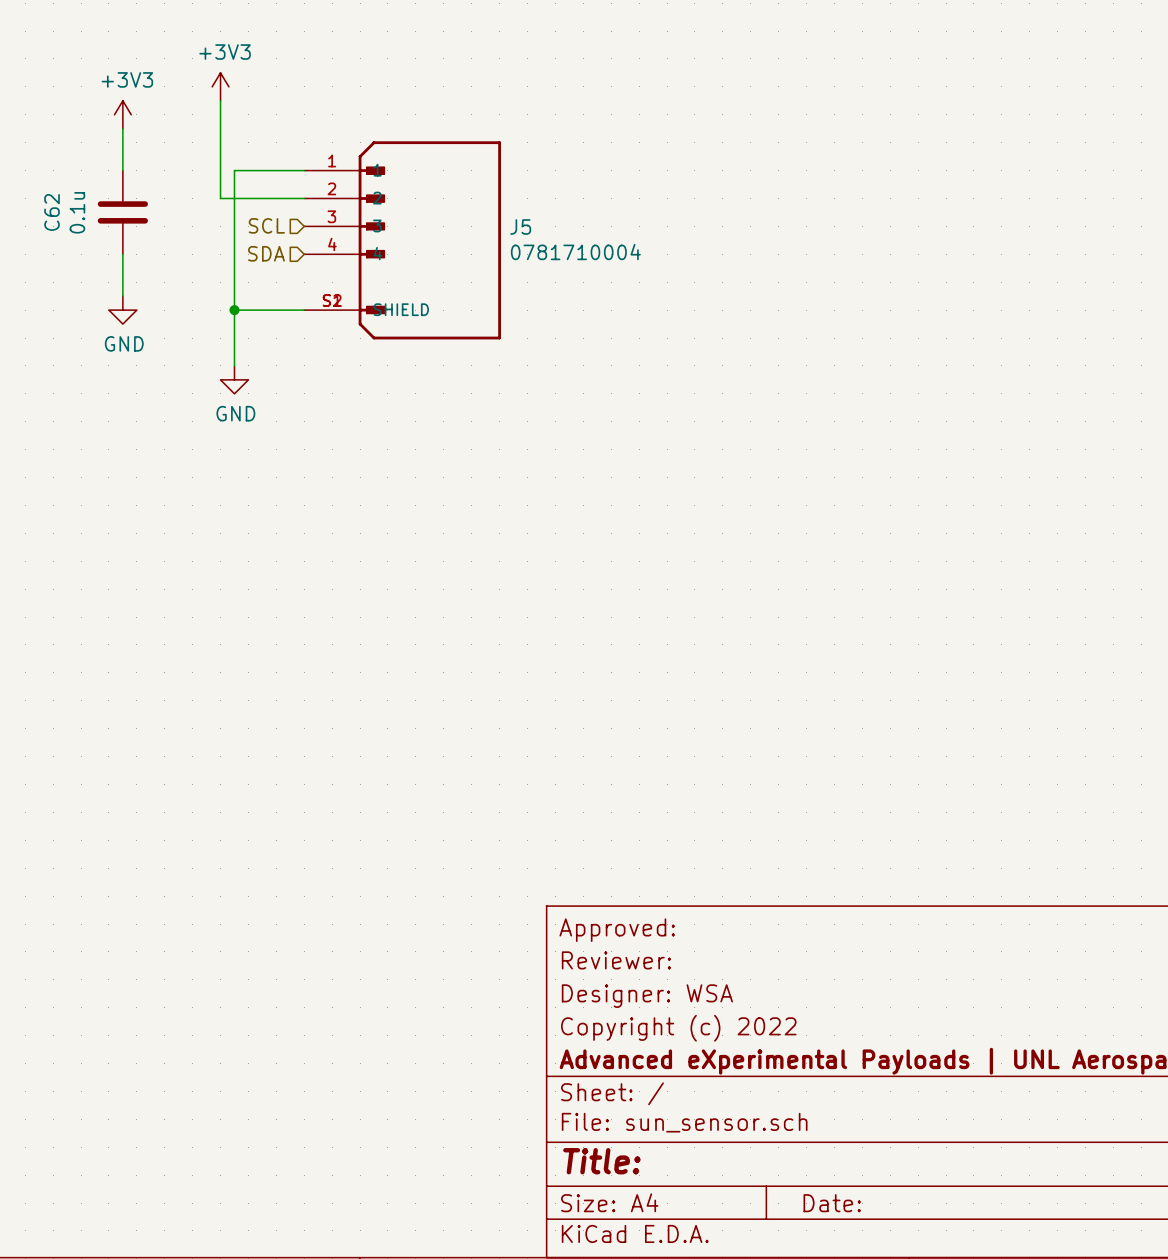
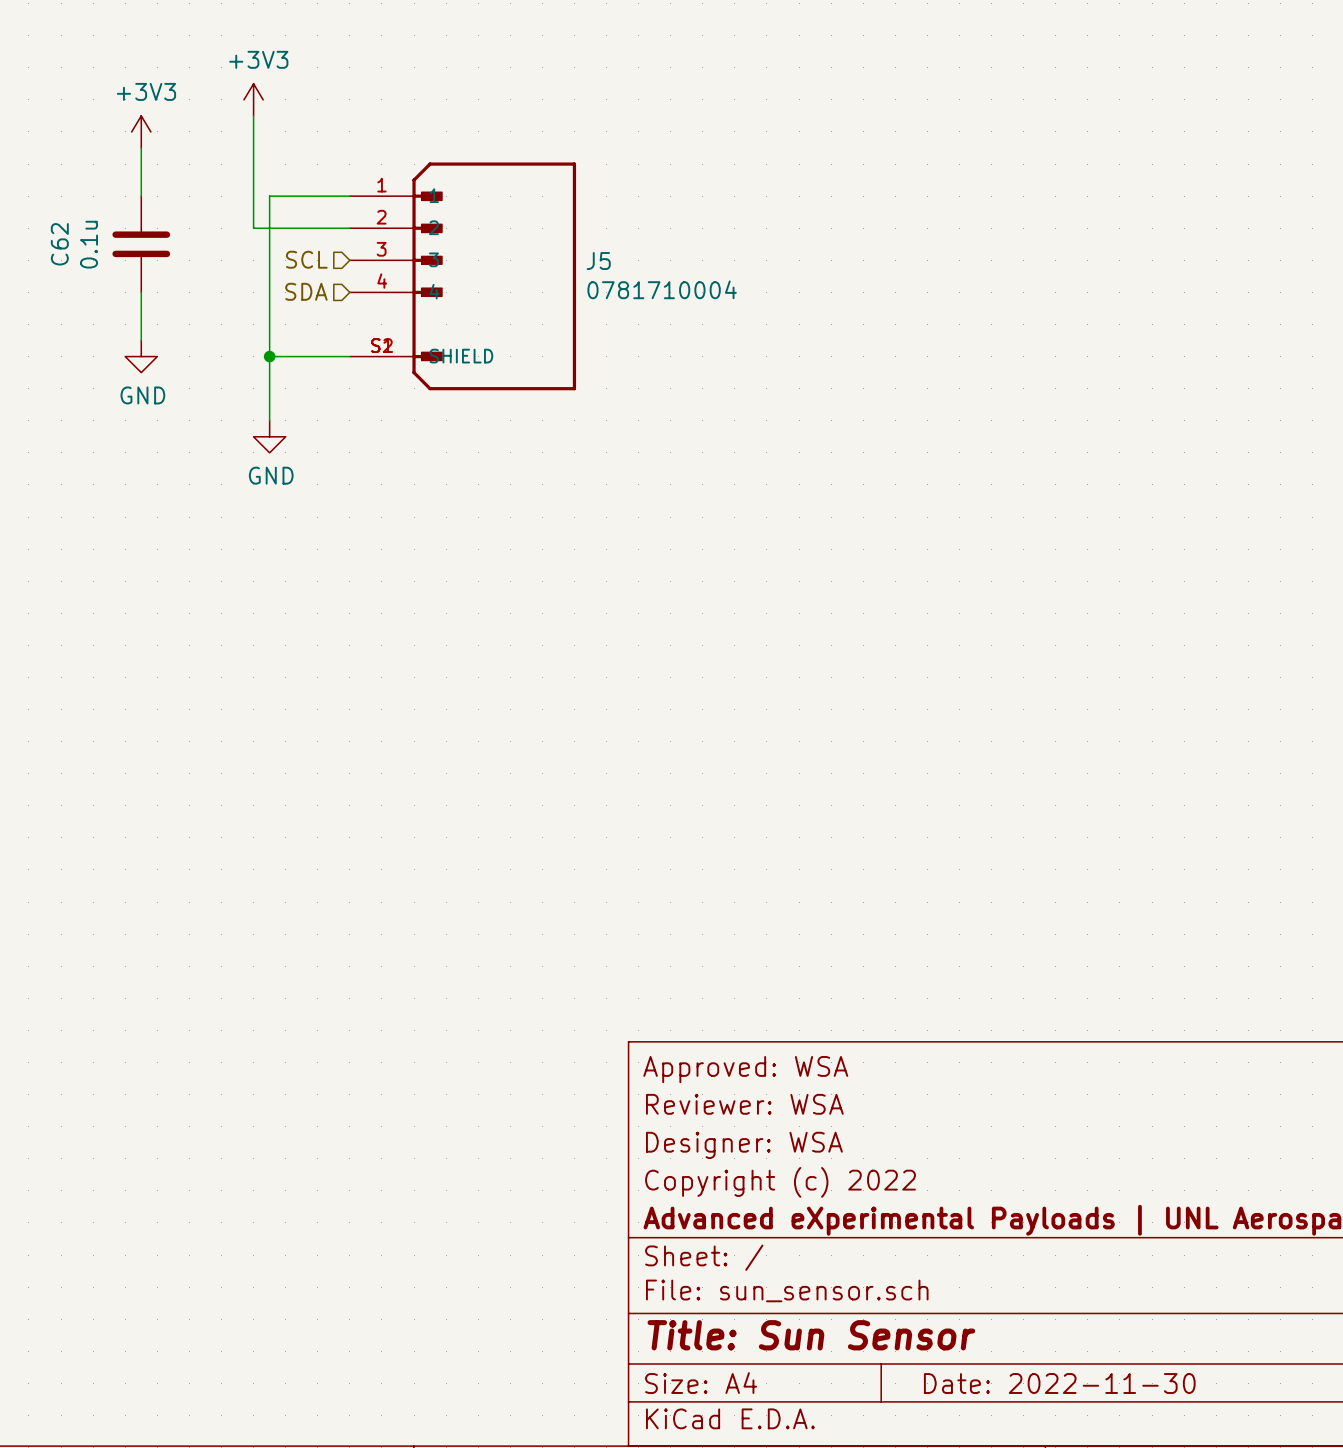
title block: Approved: (617, 930) -> Approved: WSA (745, 1069)
title block: Reviewer: (616, 960) -> Reviewer: WSA (744, 1104)
title block: Title: (601, 1161) -> Title: Sun Sensor (811, 1335)
title block: Date: (832, 1203) -> Date: 2022-11-30 (1059, 1383)

